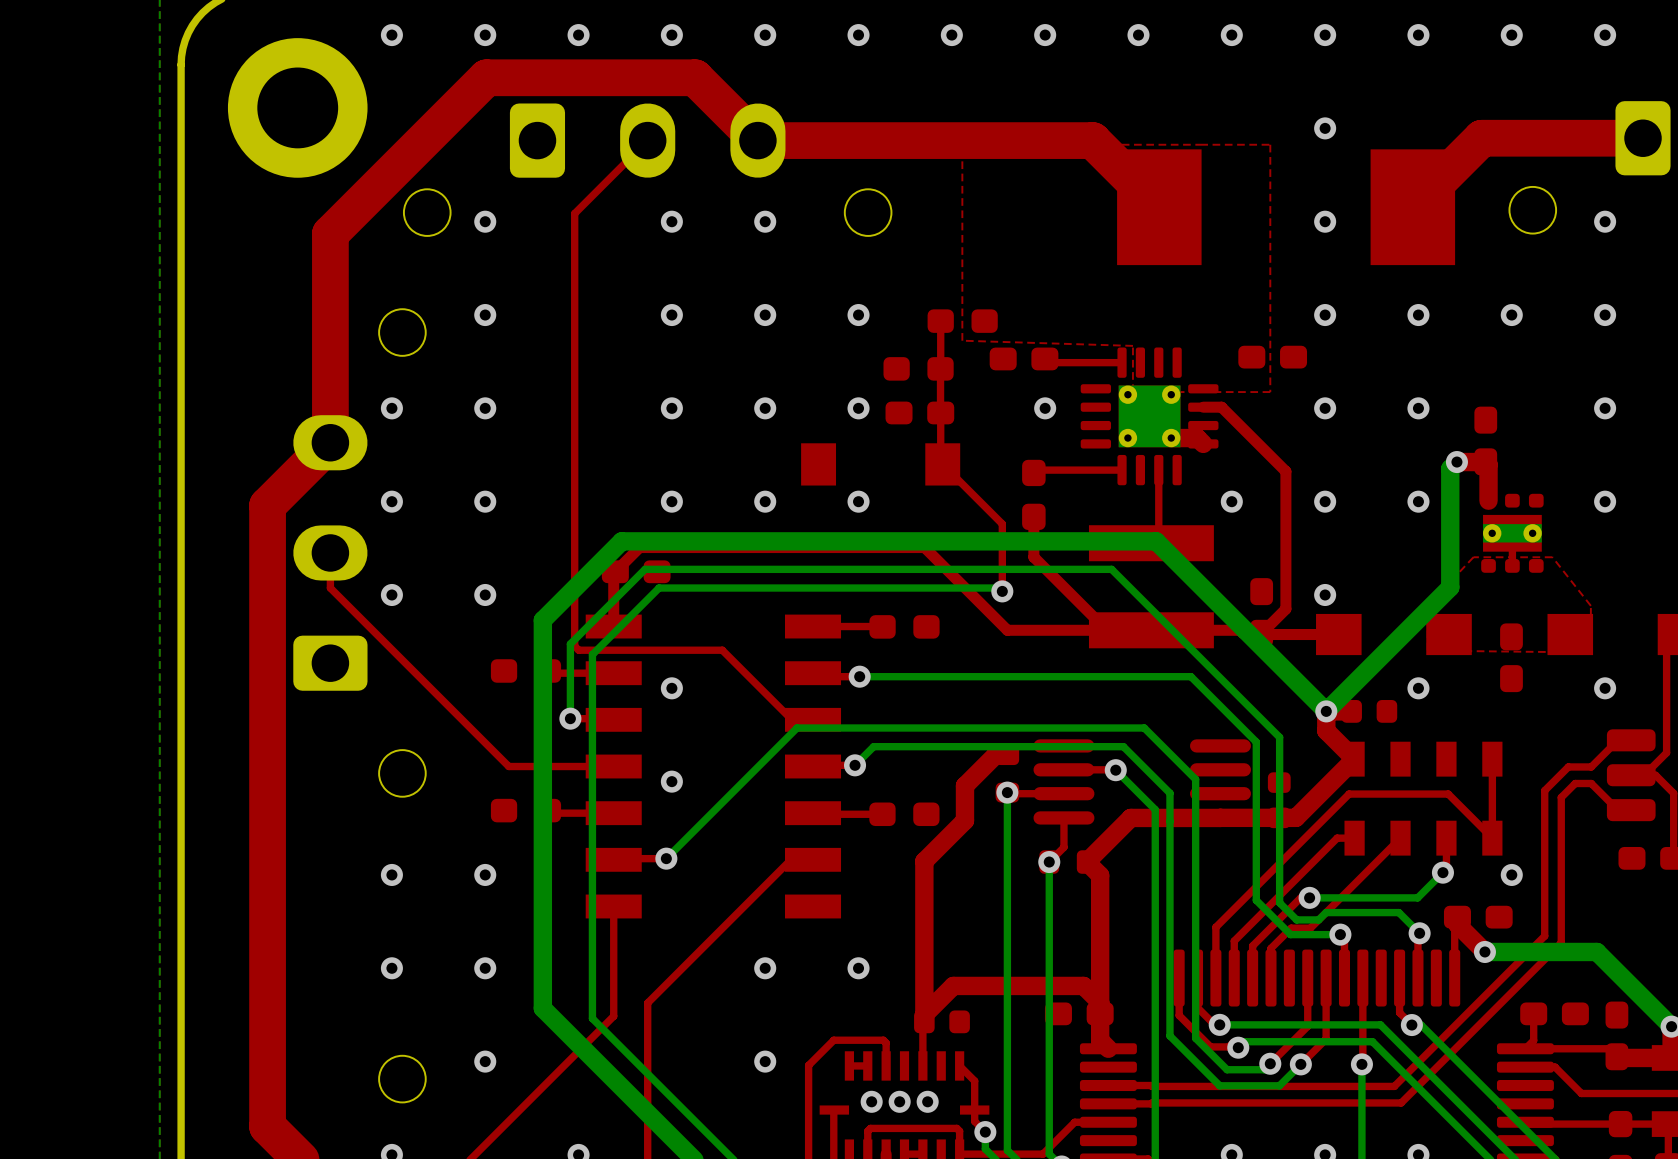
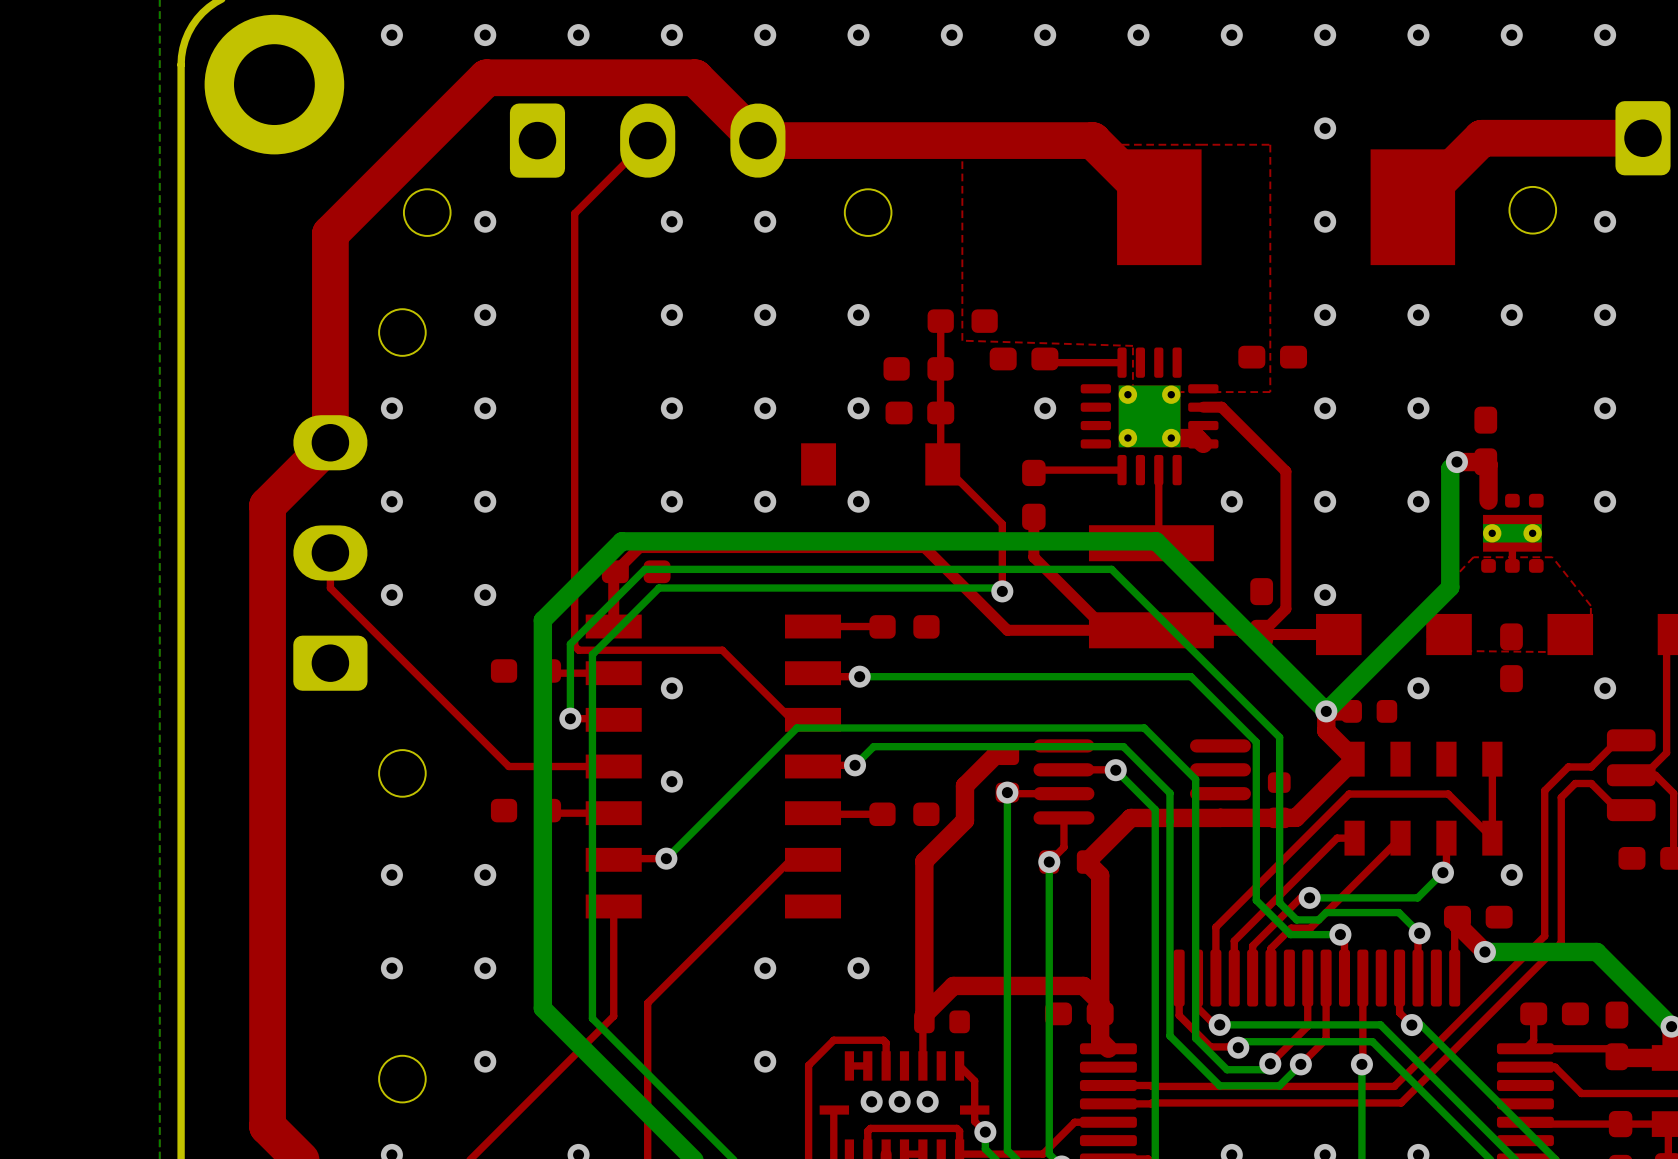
part position: (297, 107) -> (274, 84)

